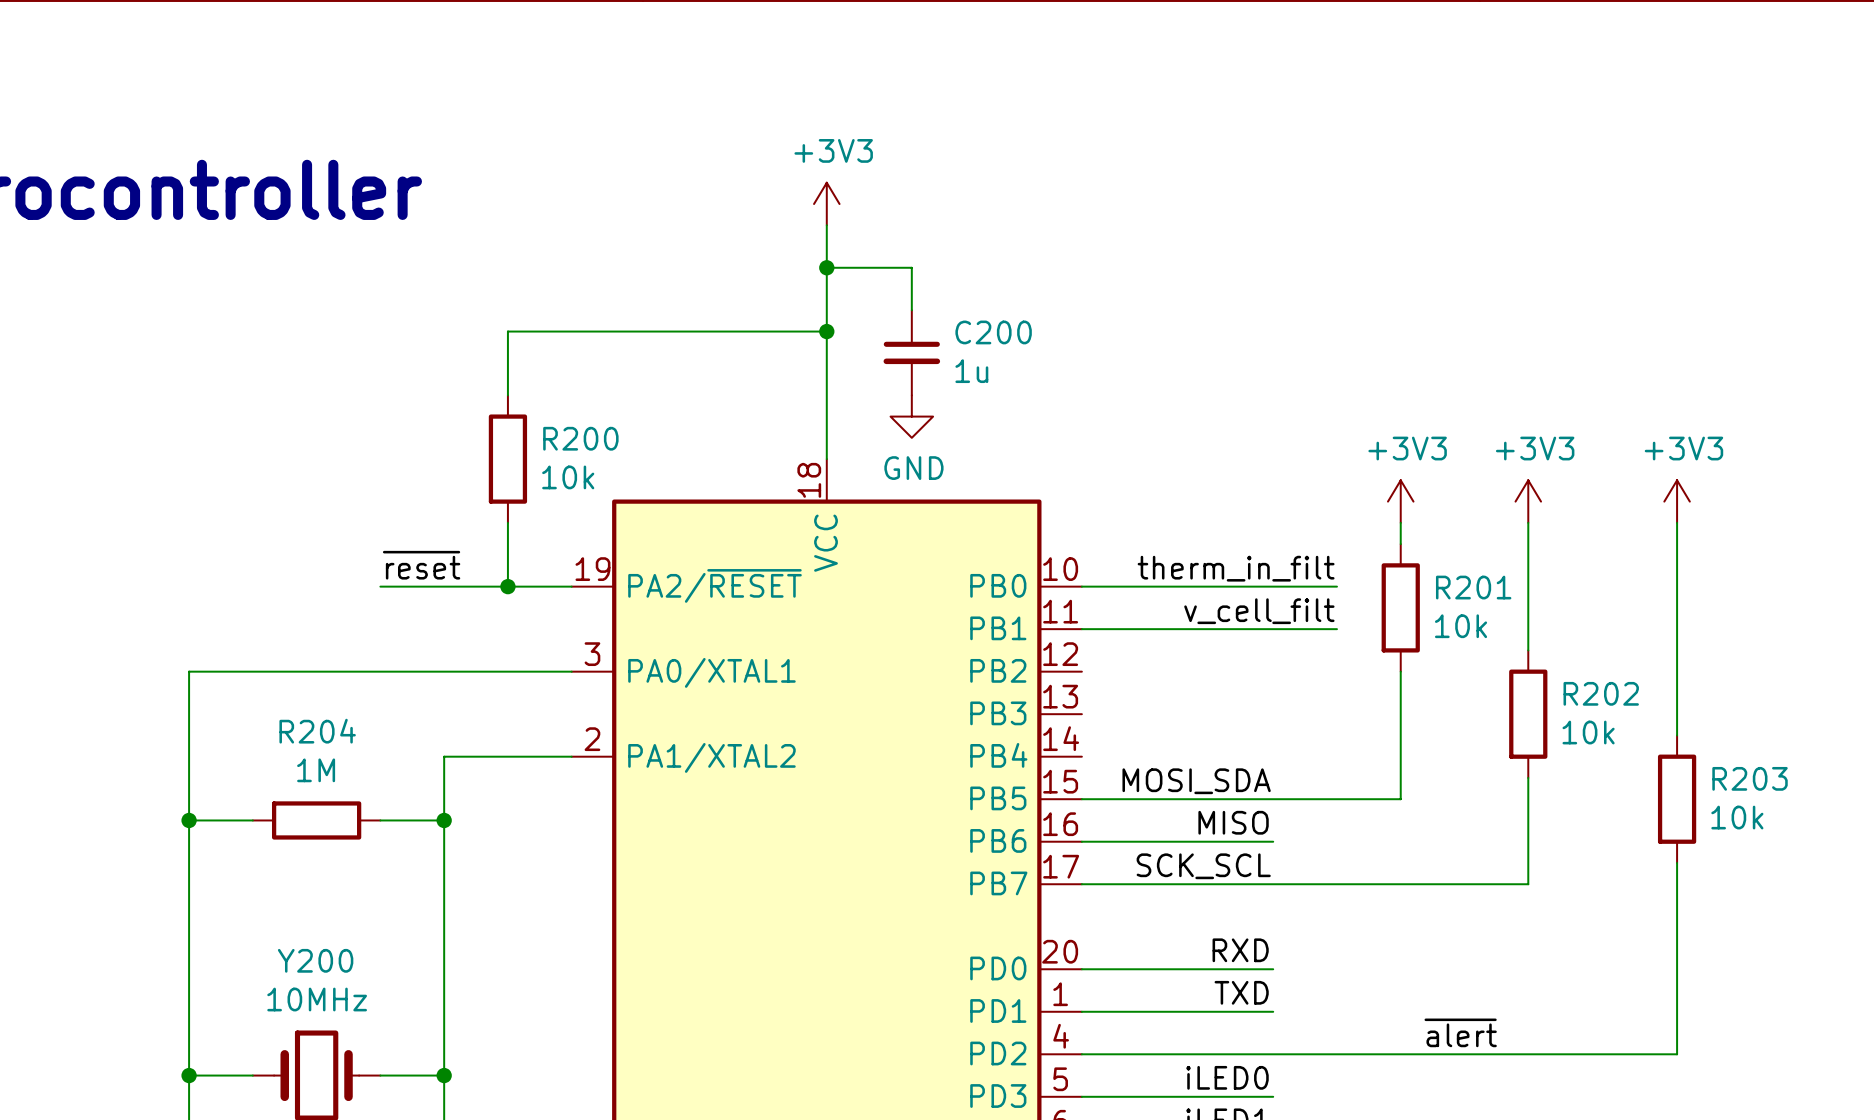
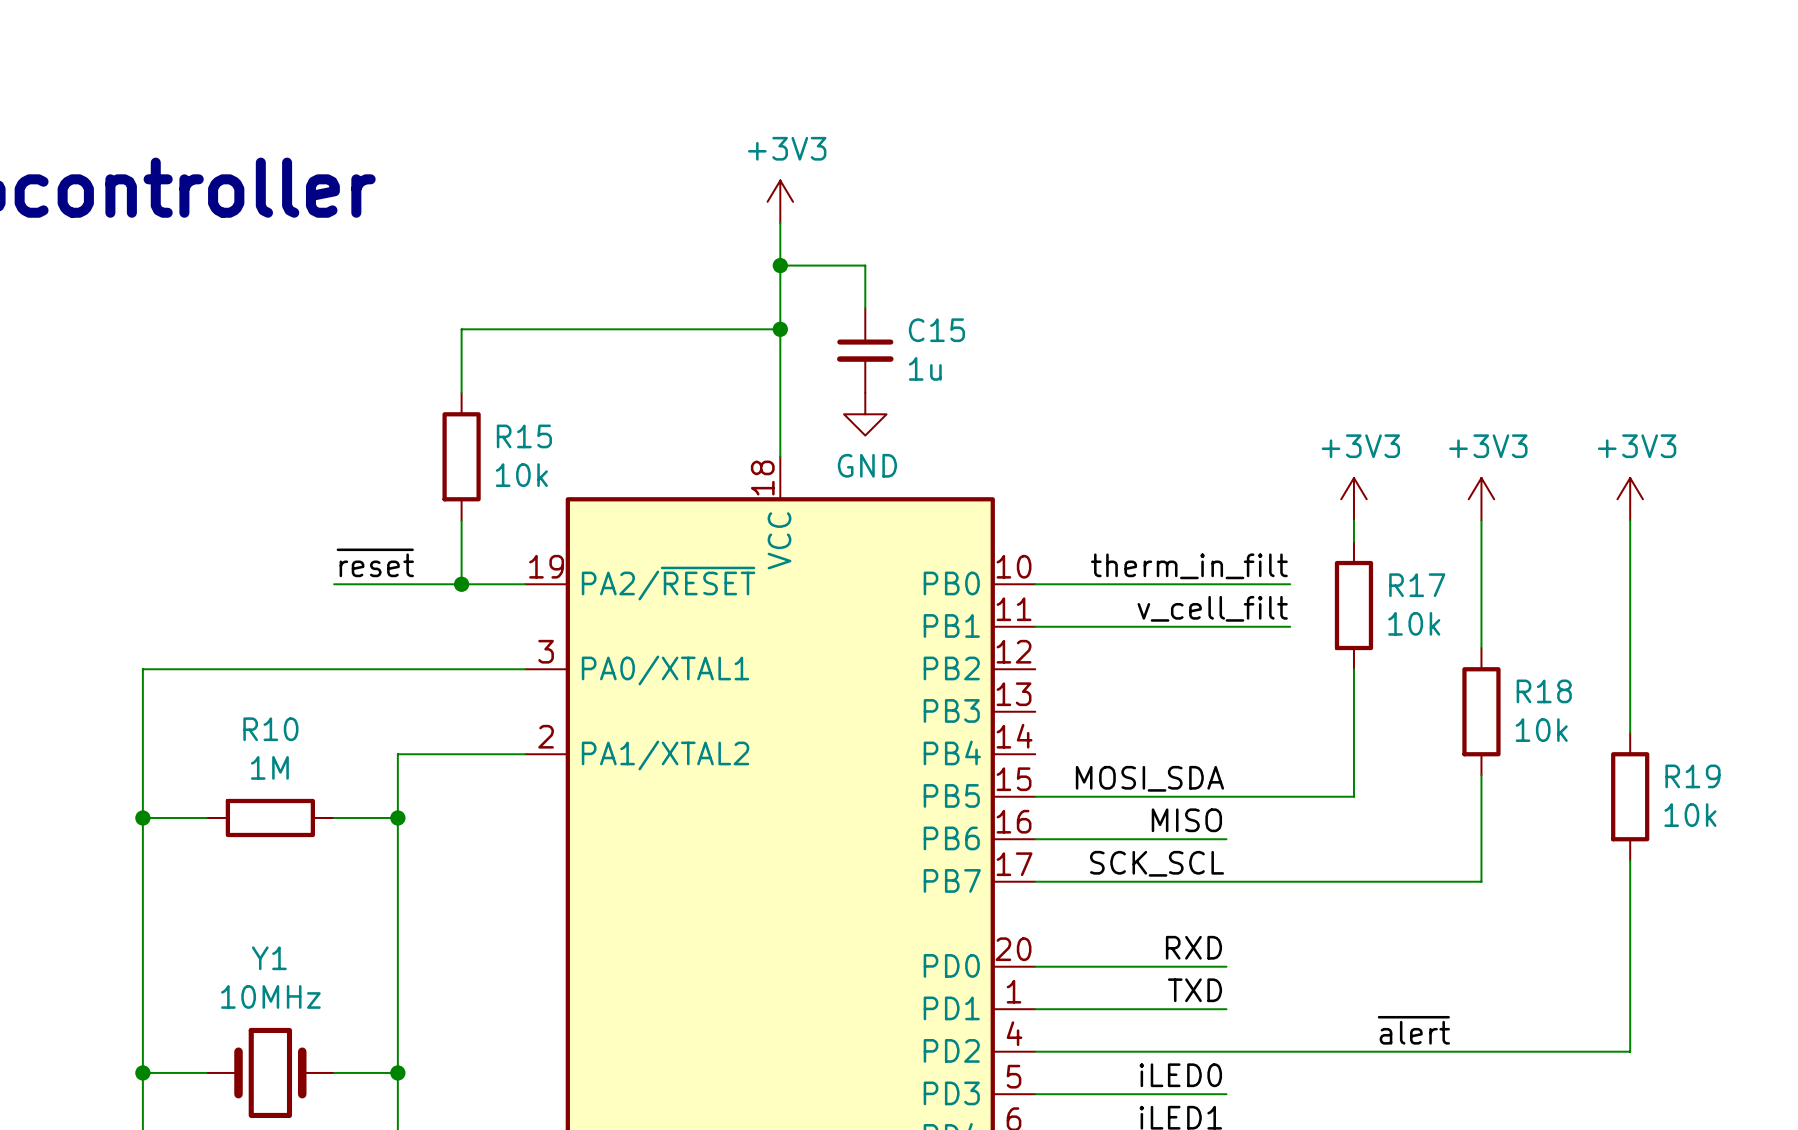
C200 name: C200 (993, 332) -> C15 (936, 330)
R200 name: R200 (580, 438) -> R15 (524, 436)
R201 name: R201 (1473, 587) -> R17 (1417, 585)
R202 name: R202 (1601, 693) -> R18 (1544, 691)
R204 name: R204 (317, 731) -> R10 (270, 729)
R203 name: R203 (1750, 778) -> R19 (1692, 776)
Y200 name: Y200 (315, 960) -> Y1 (269, 958)

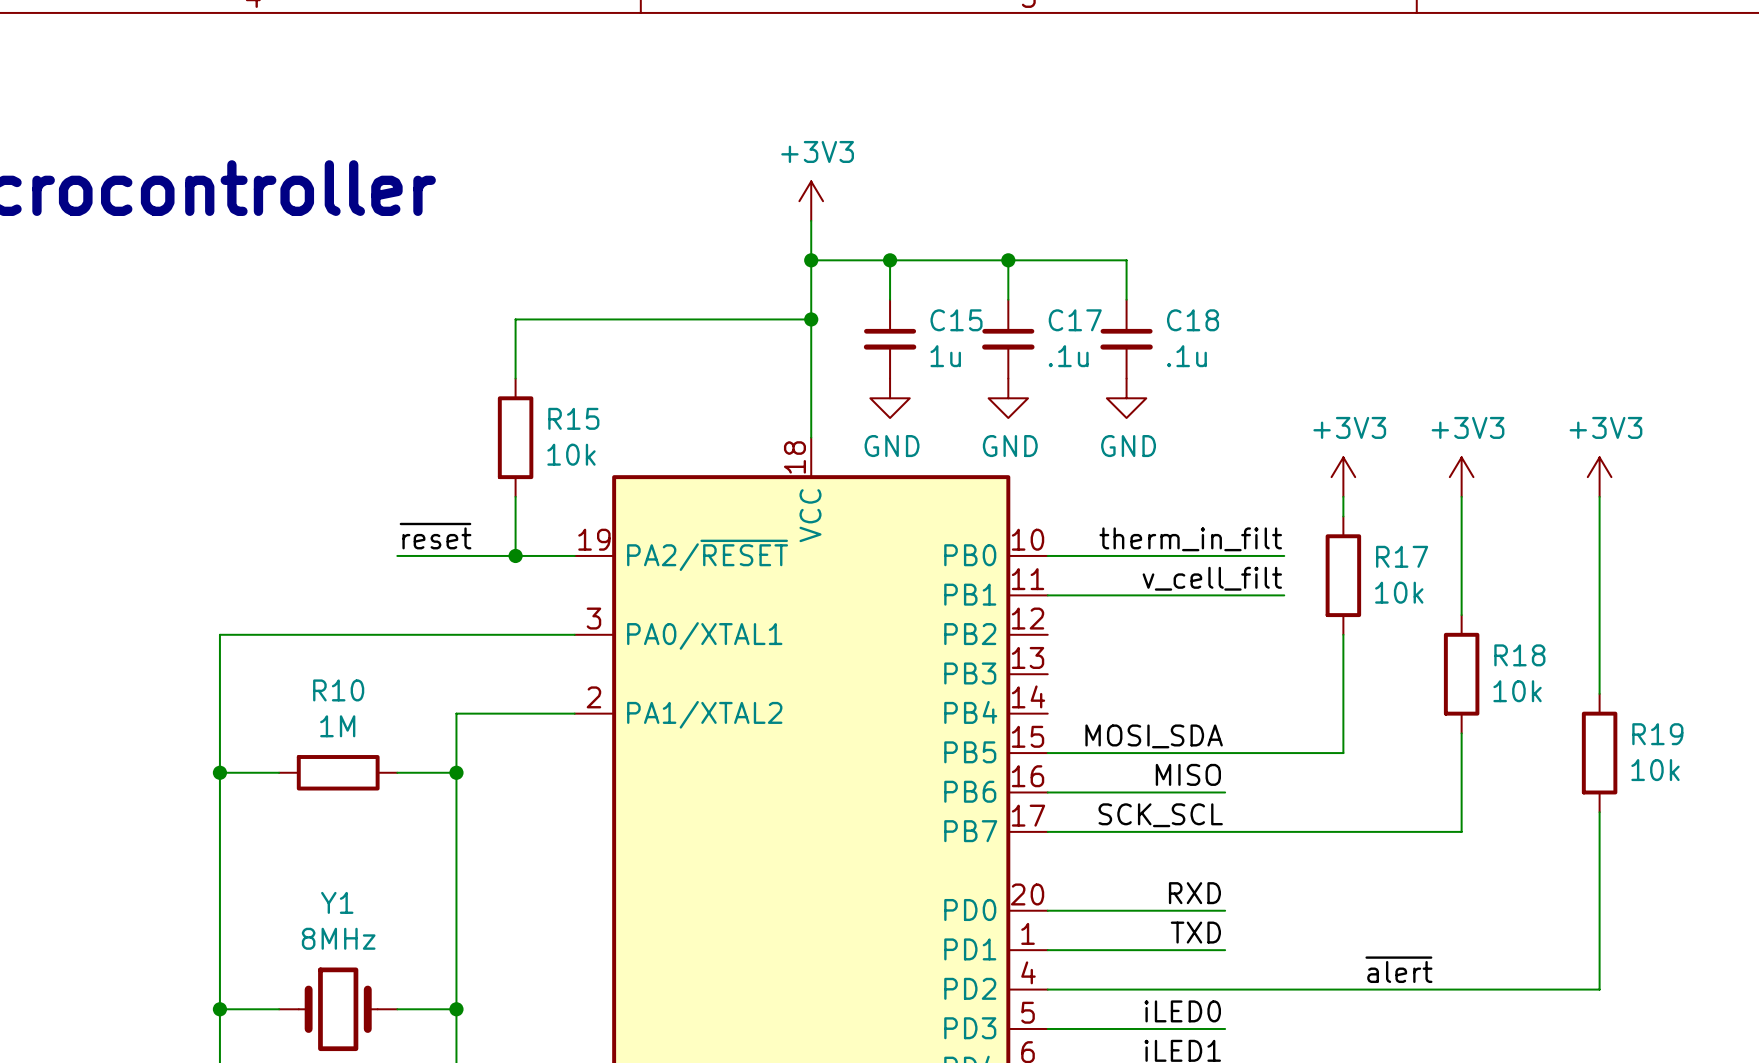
wire: none -> (890, 260) (1126, 260) (1126, 299)
junction: none -> (890, 260)
wire: none -> (1008, 260) (1008, 299)
junction: none -> (1008, 260)
C17: none -> .1u (1008, 339)
C18: none -> .1u (1126, 339)
power symbol: none -> GND (1008, 398)
power symbol: none -> GND (1126, 398)
Y1 value: 10MHz (270, 996) -> 8MHz (338, 938)

